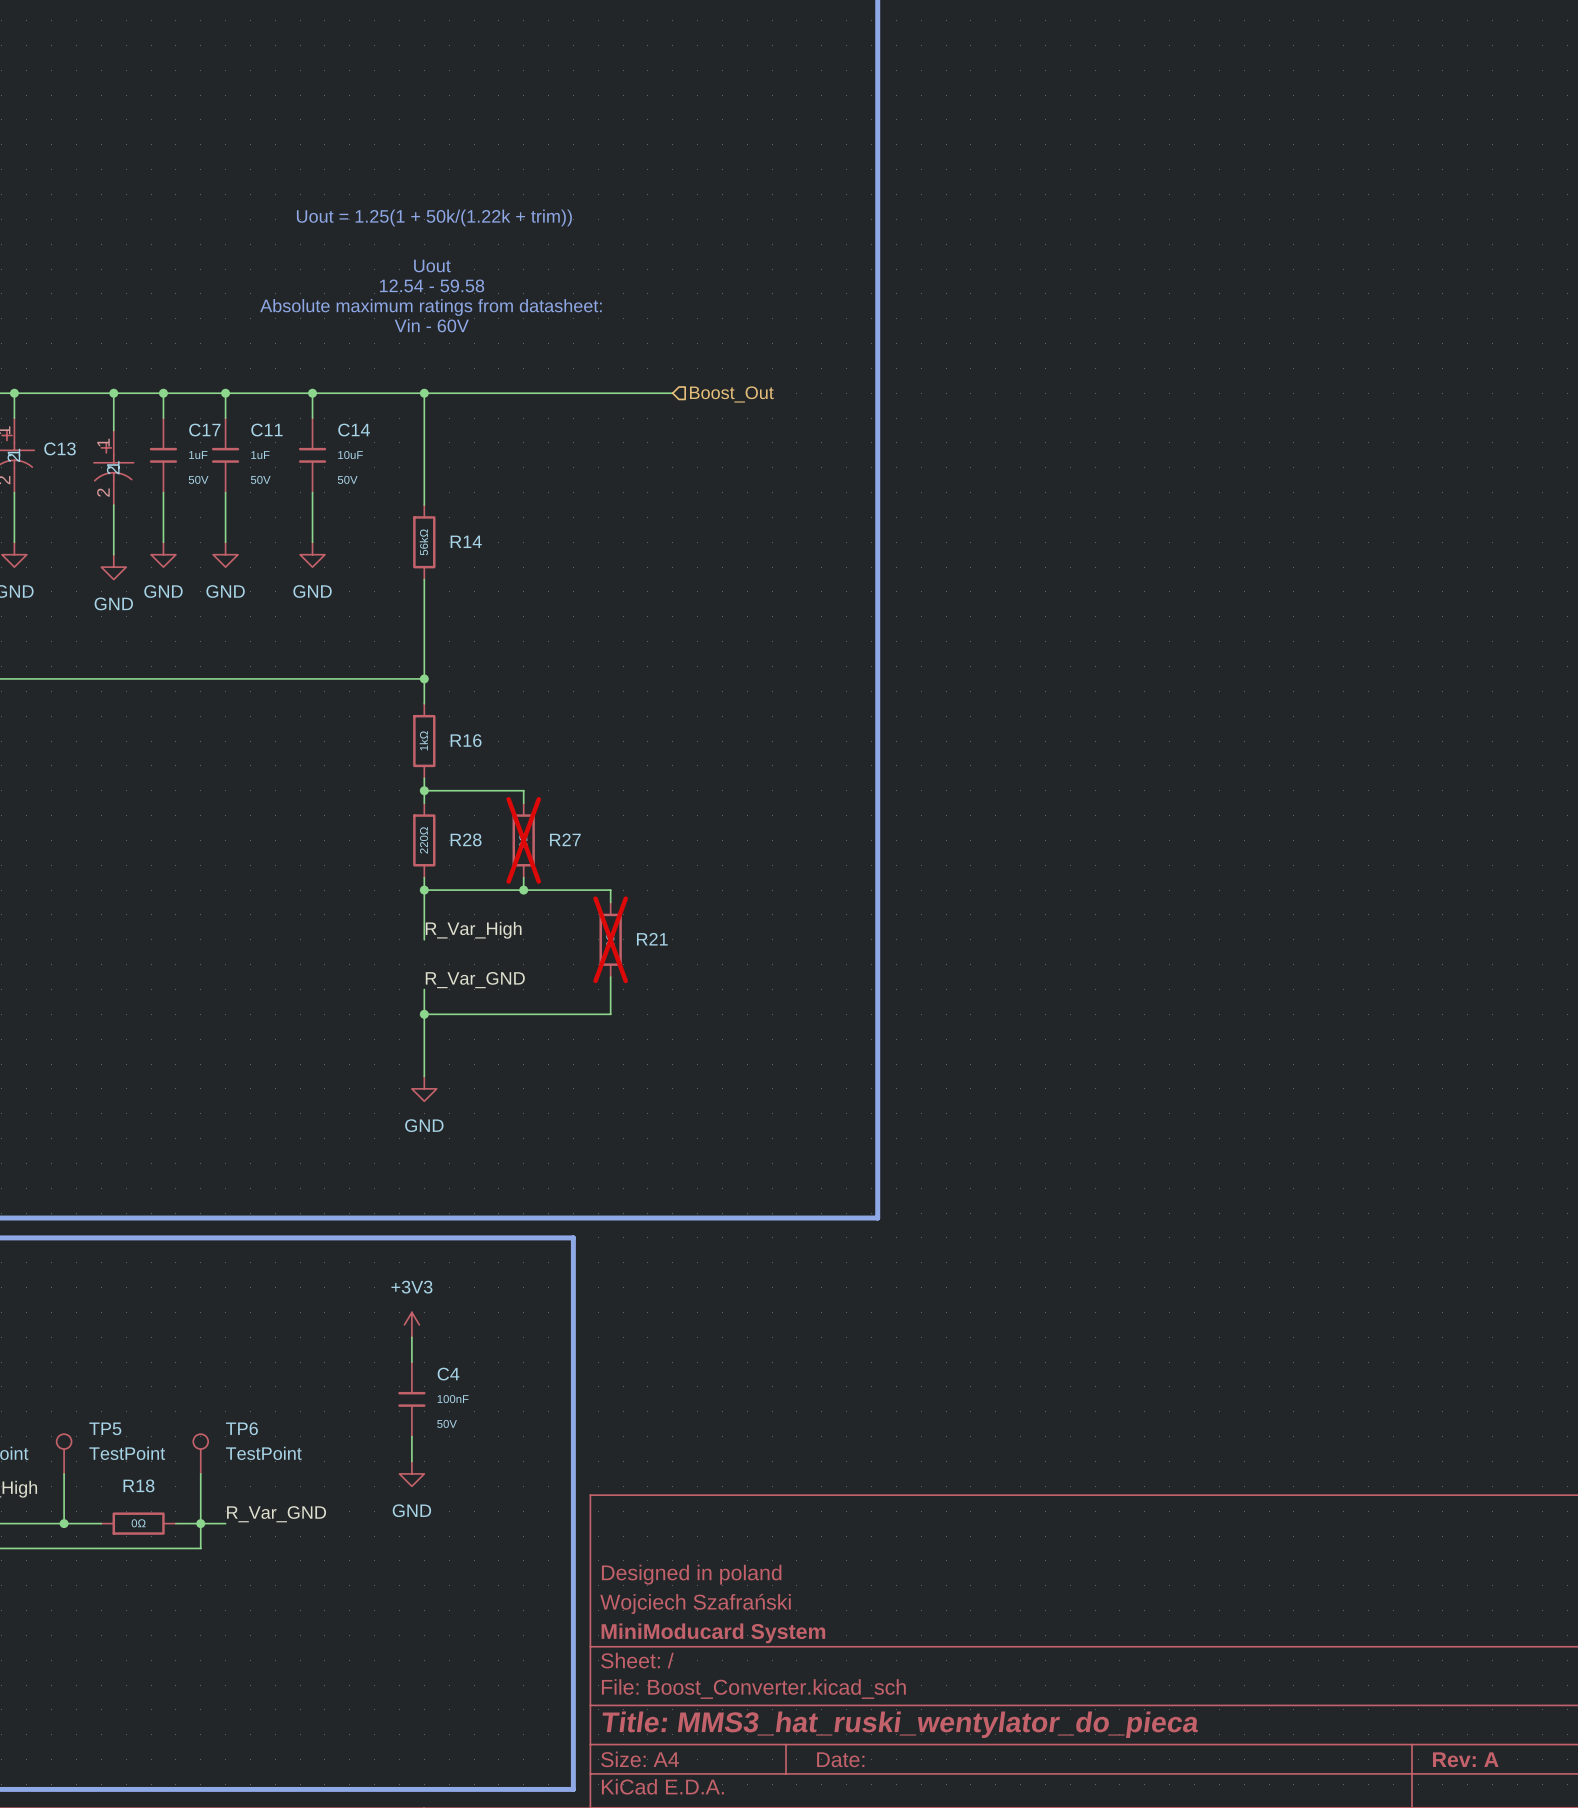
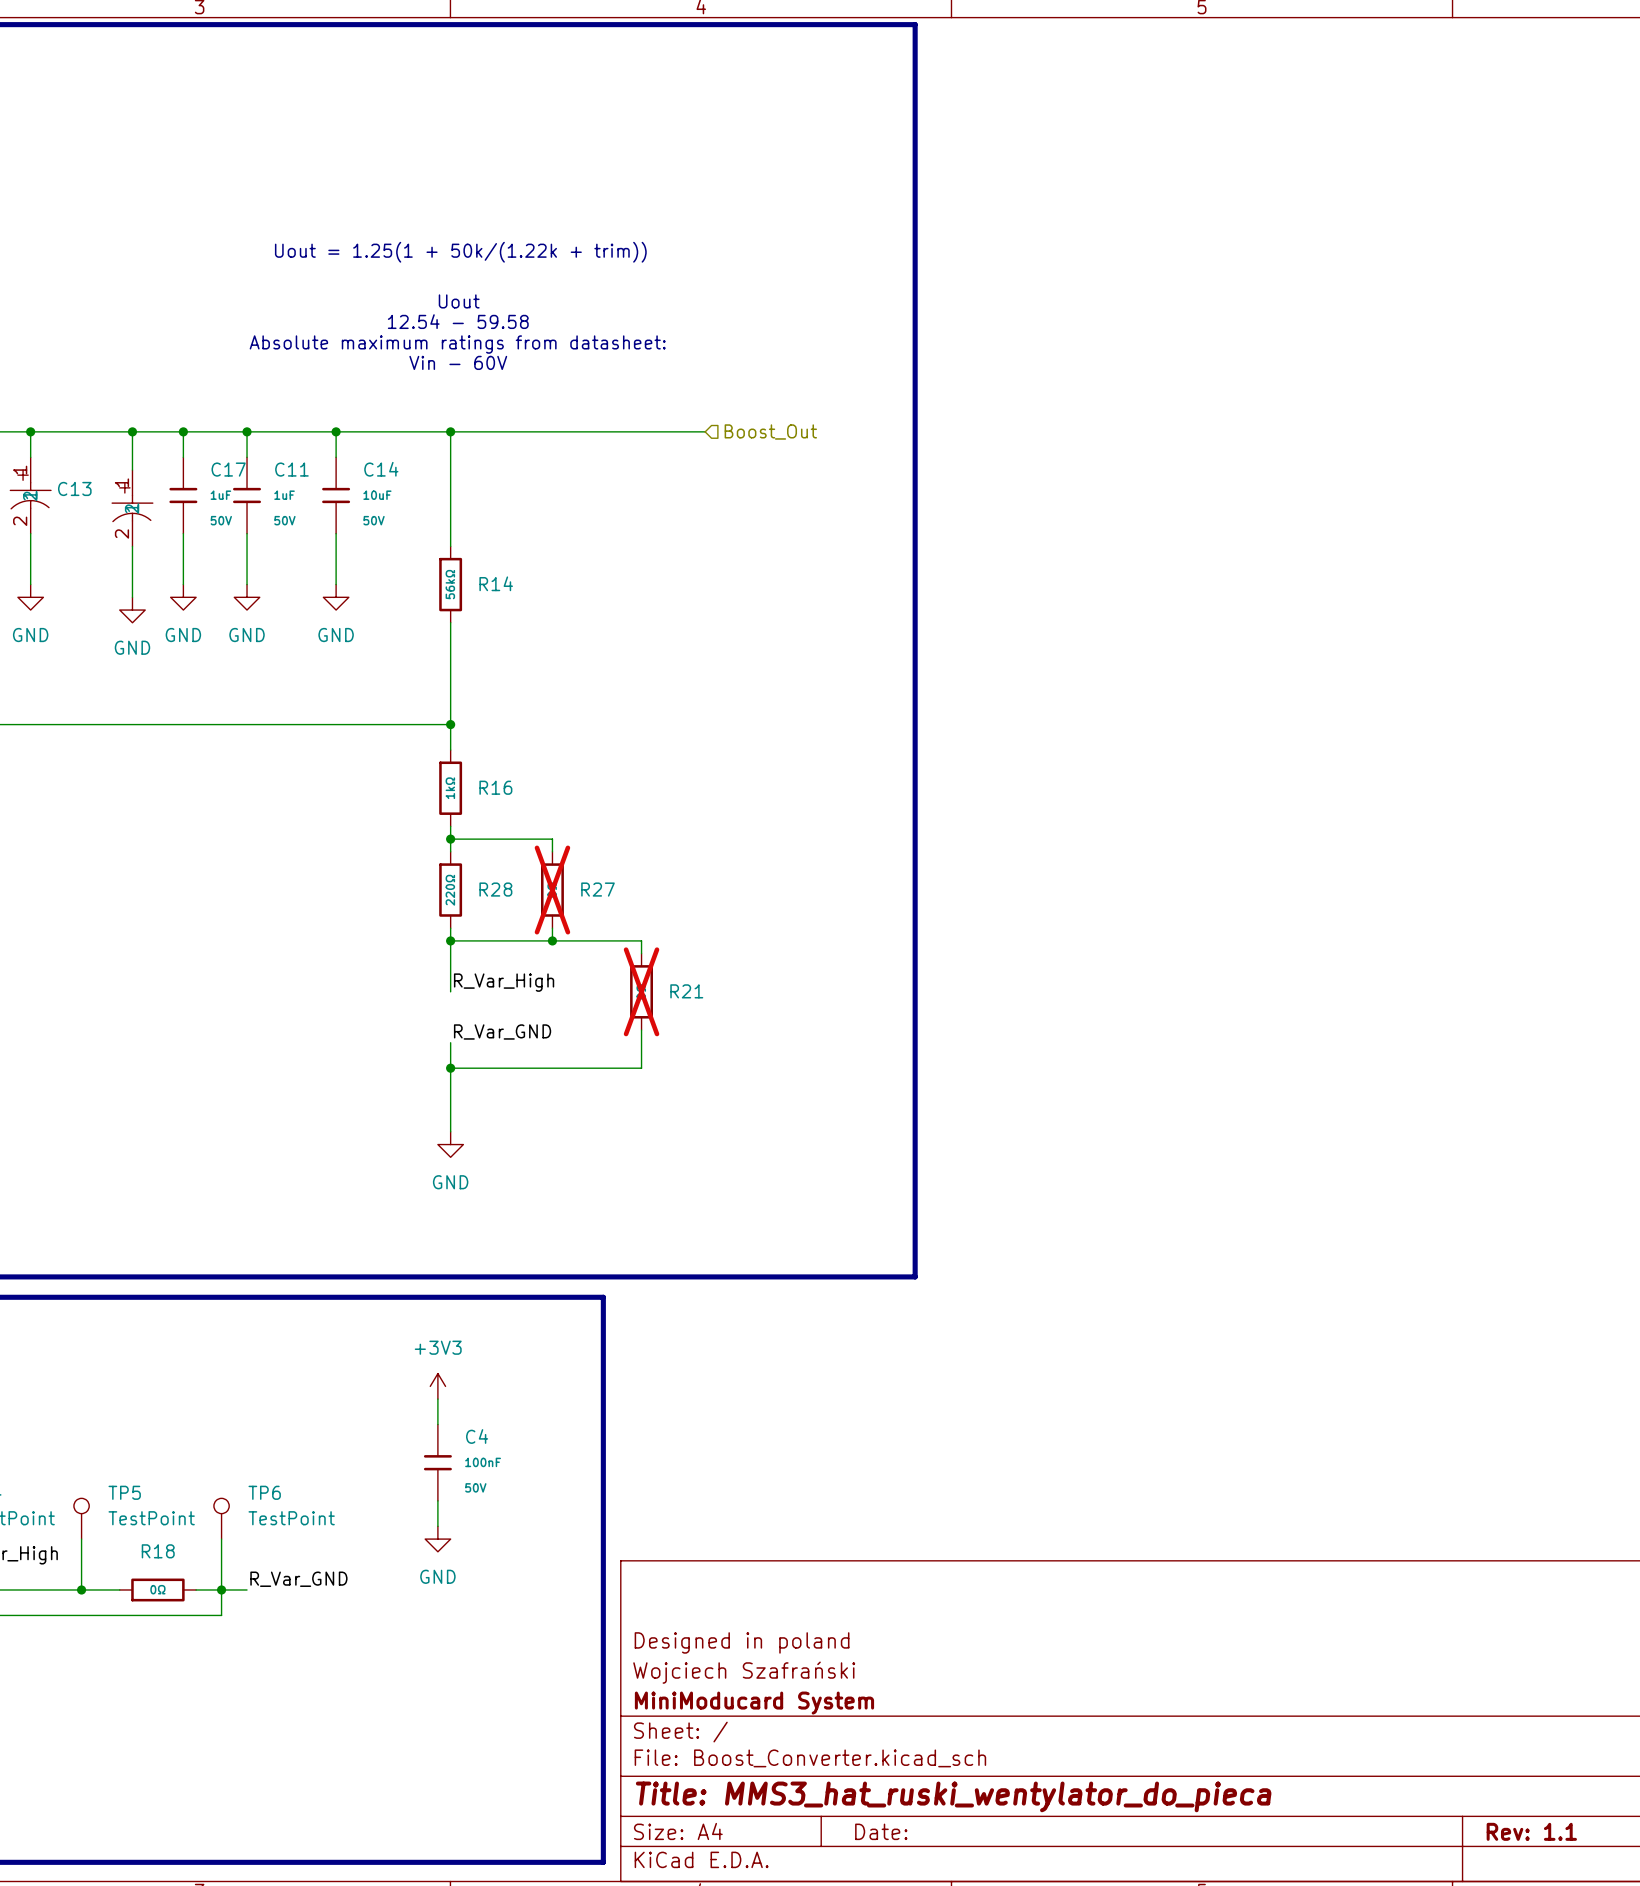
title block: Rev: A (1465, 1759) -> Rev: 1.1 (1531, 1831)

